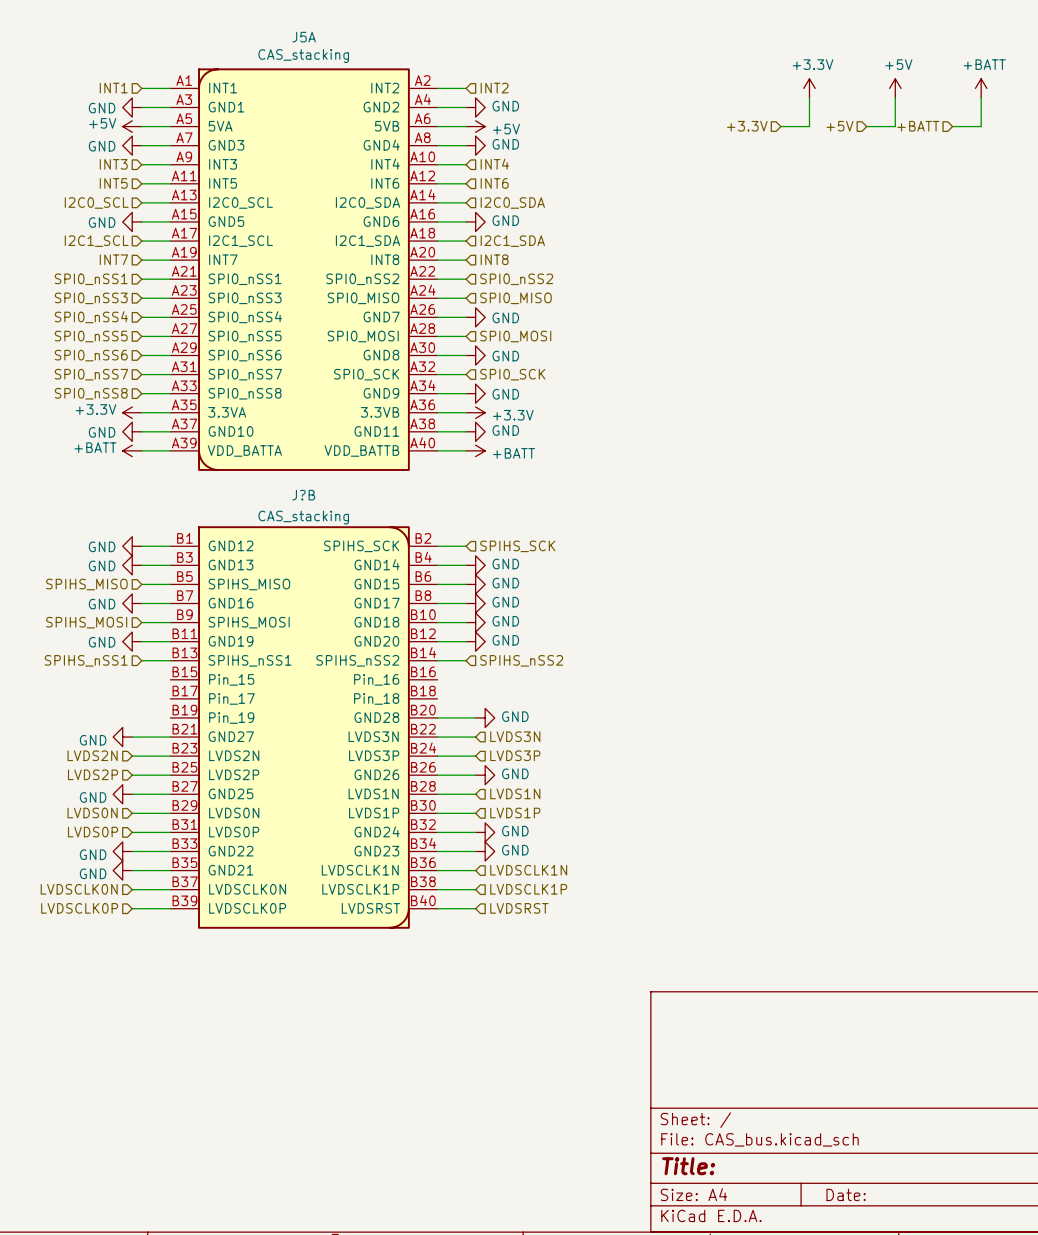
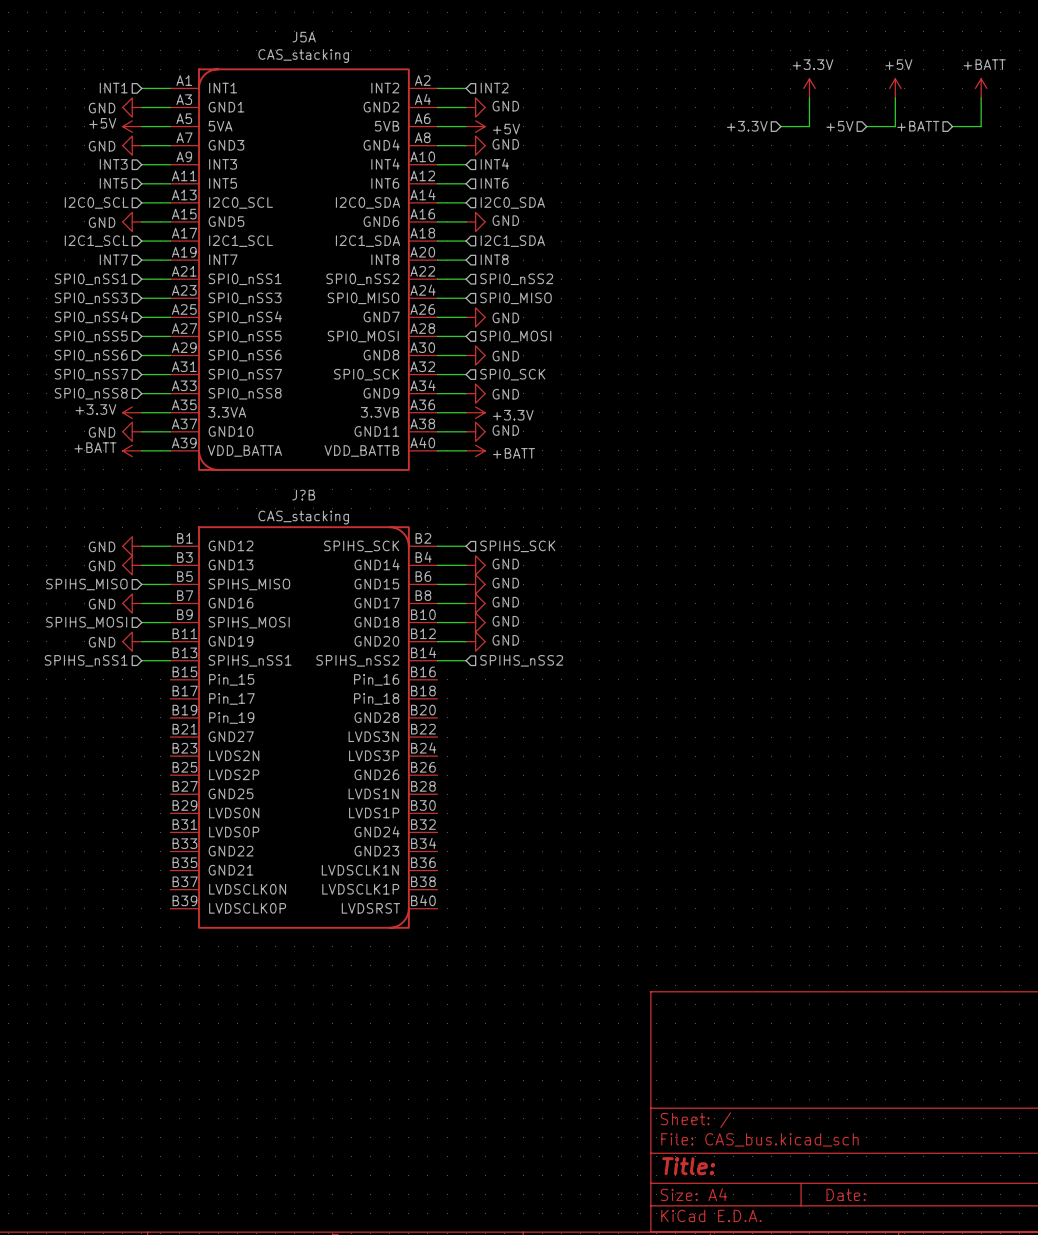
wire: (437, 717) (475, 717) -> none
power symbol: GND (485, 717) -> none
hierarchical label: LVDS3N (515, 736) -> none
power symbol: GND (122, 737) -> none
wire: (132, 737) (170, 737) -> none
wire: (437, 737) (475, 737) -> none
hierarchical label: LVDS2N (92, 755) -> none
hierarchical label: LVDS3P (515, 755) -> none
wire: (132, 756) (170, 756) -> none
wire: (437, 756) (475, 756) -> none
hierarchical label: LVDS2P (93, 774) -> none
wire: (132, 775) (170, 775) -> none
wire: (437, 775) (475, 775) -> none
power symbol: GND (485, 775) -> none
hierarchical label: LVDS1N (515, 793) -> none
power symbol: GND (122, 794) -> none
wire: (132, 794) (170, 794) -> none
wire: (437, 794) (475, 794) -> none
hierarchical label: LVDS0N (92, 812) -> none
hierarchical label: LVDS1P (515, 812) -> none
wire: (132, 813) (170, 813) -> none
wire: (437, 813) (475, 813) -> none
hierarchical label: LVDS0P (93, 832) -> none
wire: (132, 832) (170, 832) -> none
wire: (437, 832) (475, 832) -> none
power symbol: GND (485, 832) -> none
power symbol: GND (122, 851) -> none
wire: (132, 851) (170, 851) -> none
wire: (437, 851) (475, 851) -> none
power symbol: GND (485, 851) -> none
power symbol: GND (122, 870) -> none
wire: (132, 870) (170, 870) -> none
wire: (437, 870) (475, 870) -> none
hierarchical label: LVDSCLK1N (528, 870) -> none
hierarchical label: LVDSCLK0N (79, 889) -> none
wire: (132, 889) (170, 889) -> none
wire: (437, 889) (475, 889) -> none
hierarchical label: LVDSCLK1P (528, 889) -> none
hierarchical label: LVDSCLK0P (79, 908) -> none
wire: (132, 908) (170, 908) -> none
wire: (437, 908) (475, 908) -> none
hierarchical label: LVDSRST (519, 908) -> none

